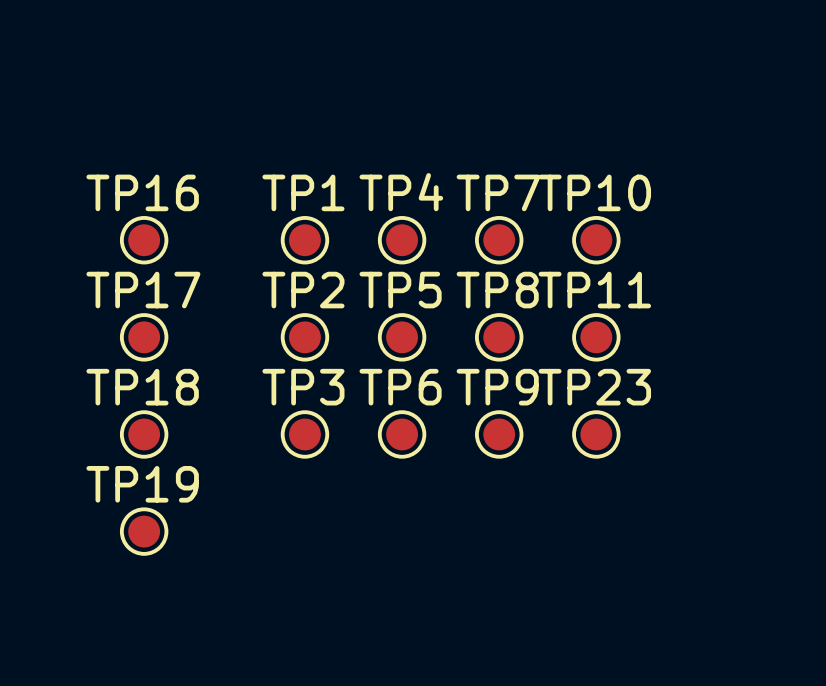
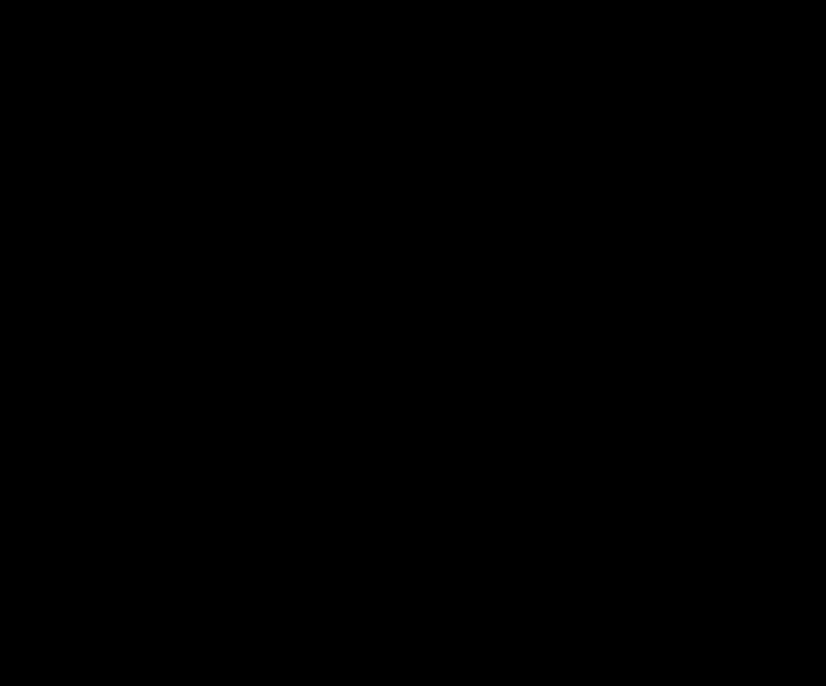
TP16: (144, 240) -> none
TP1: (304, 240) -> none
TP4: (402, 240) -> none
TP7: (499, 240) -> none
TP10: (596, 240) -> none
TP17: (144, 337) -> none
TP2: (304, 337) -> none
TP5: (402, 337) -> none
TP8: (499, 337) -> none
TP11: (596, 337) -> none
TP18: (144, 434) -> none
TP3: (304, 434) -> none
TP6: (402, 434) -> none
TP9: (499, 434) -> none
TP23: (596, 434) -> none
TP19: (144, 531) -> none

